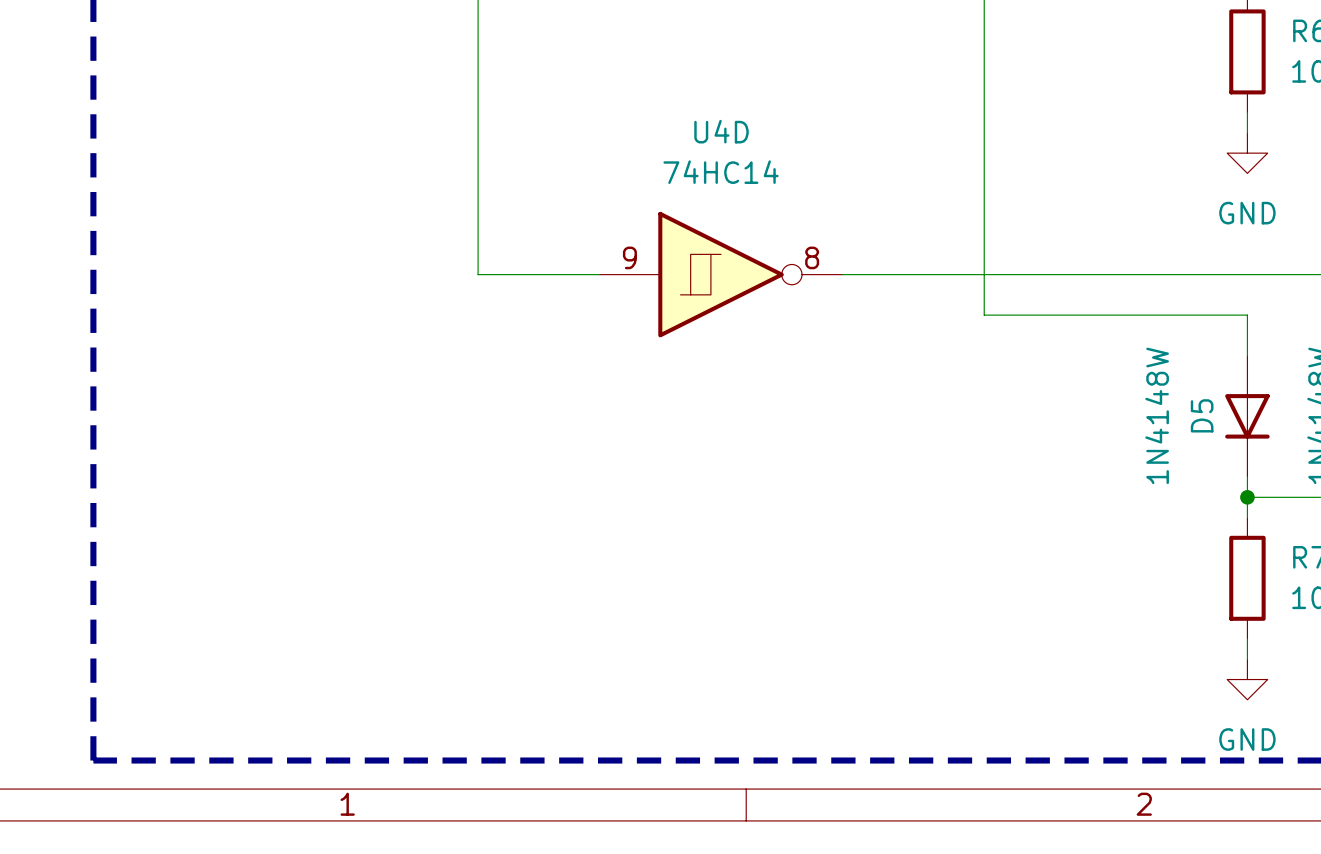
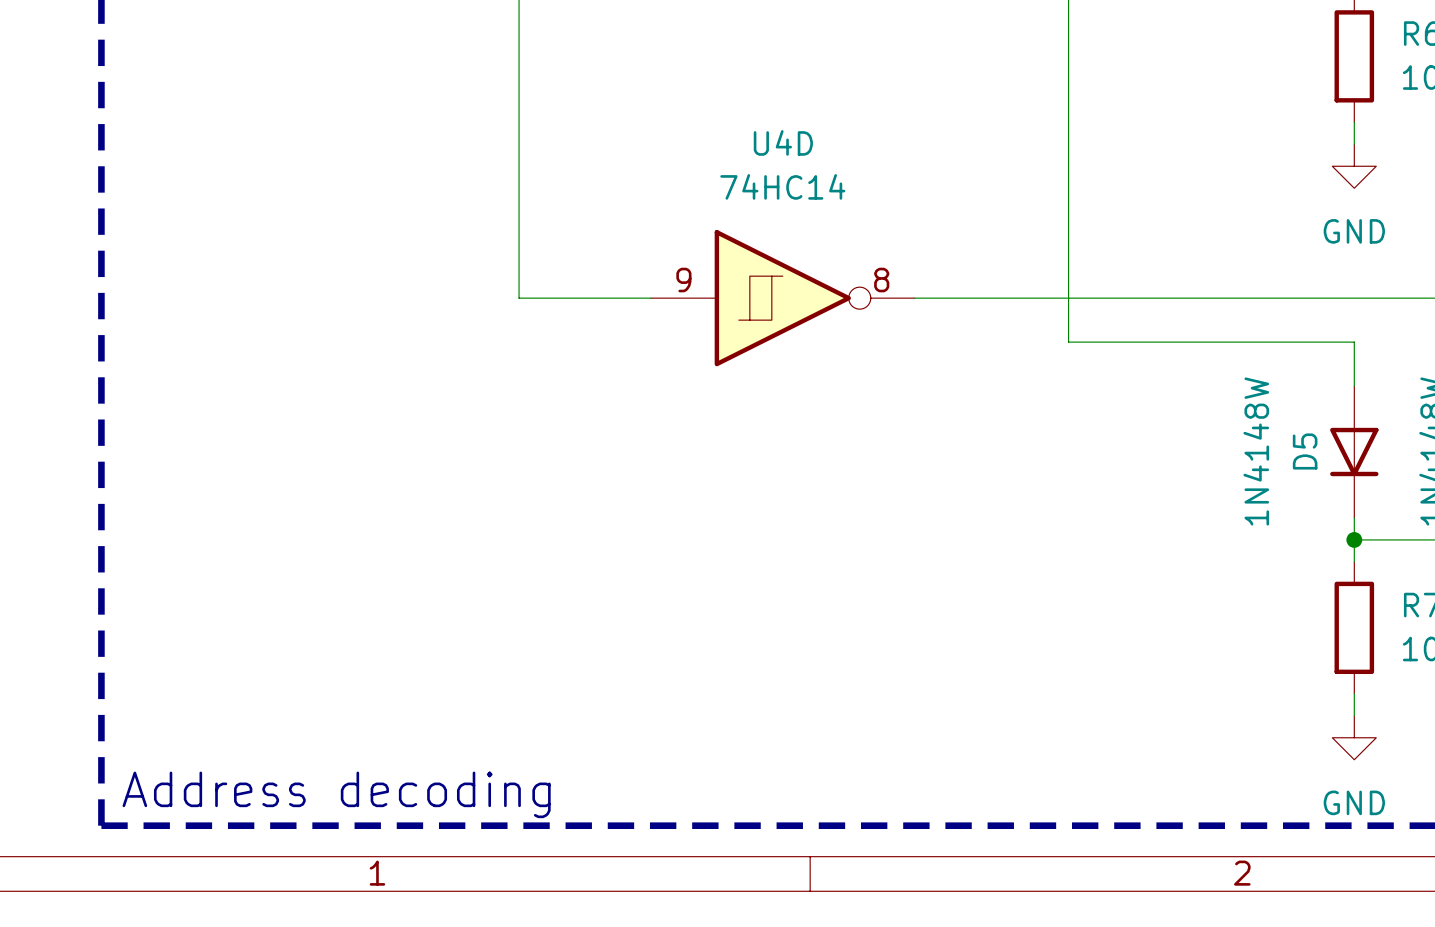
text: none -> Address decoding (336, 794)

